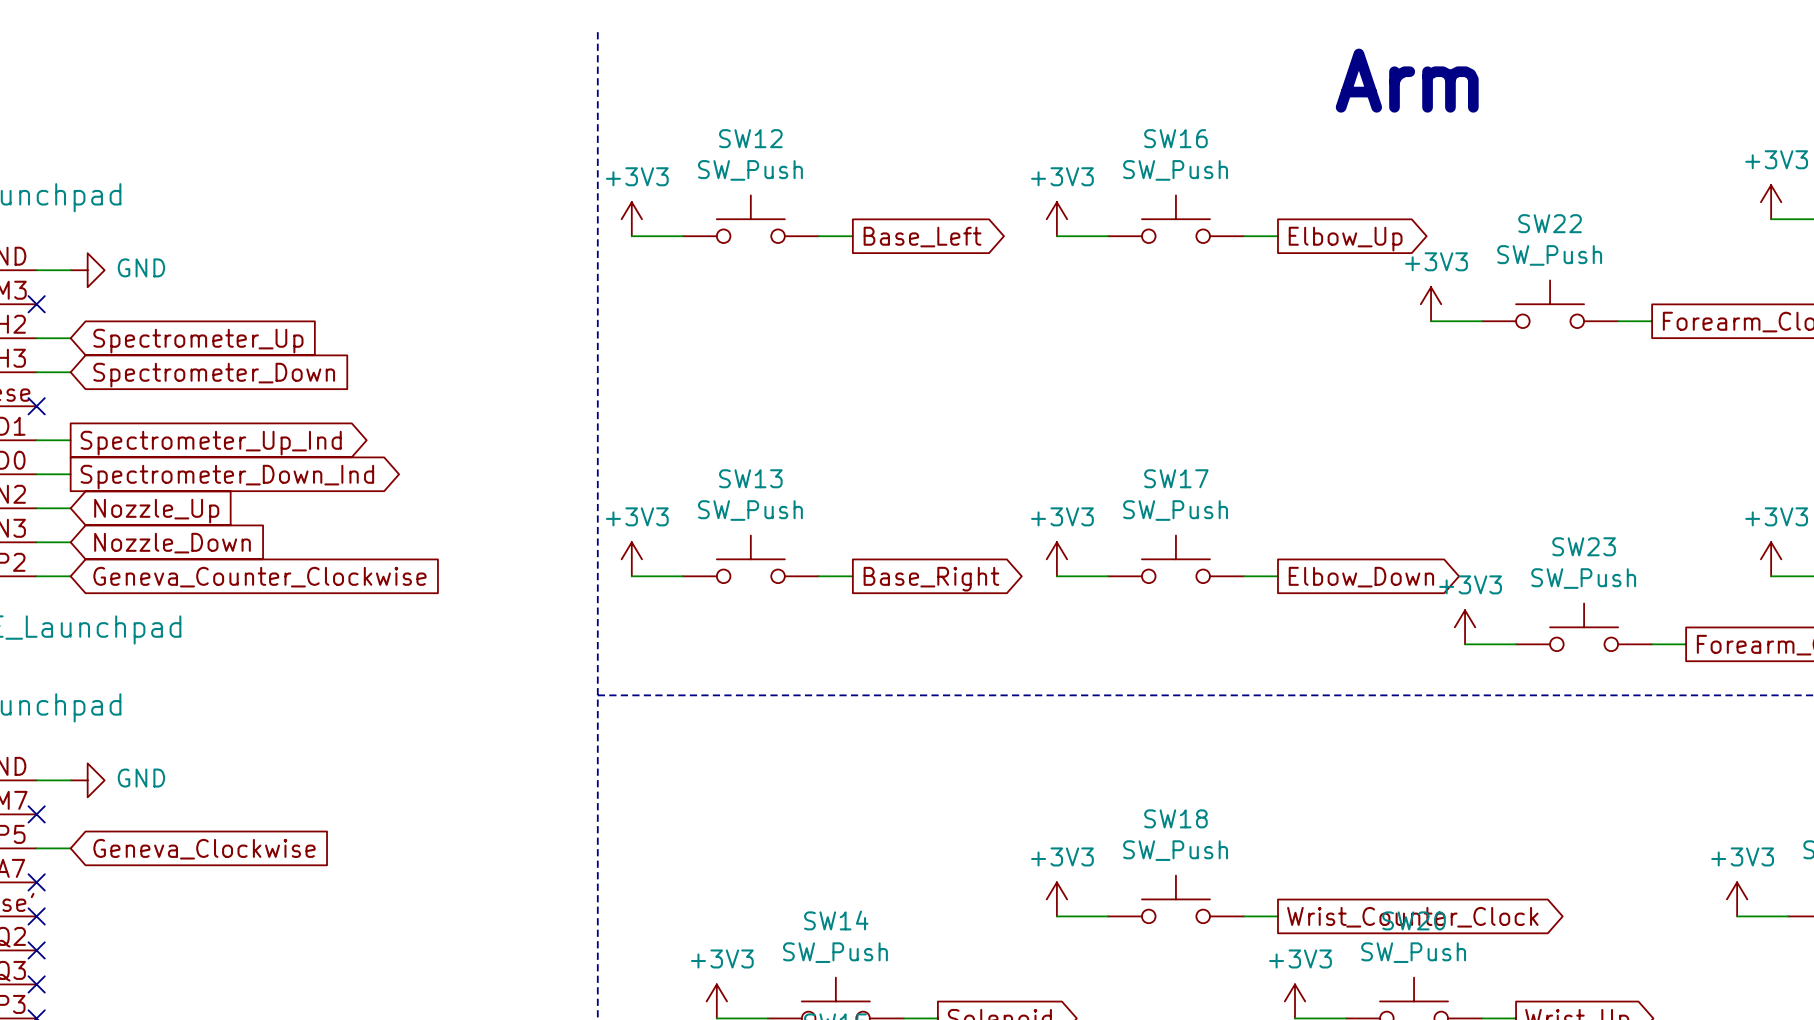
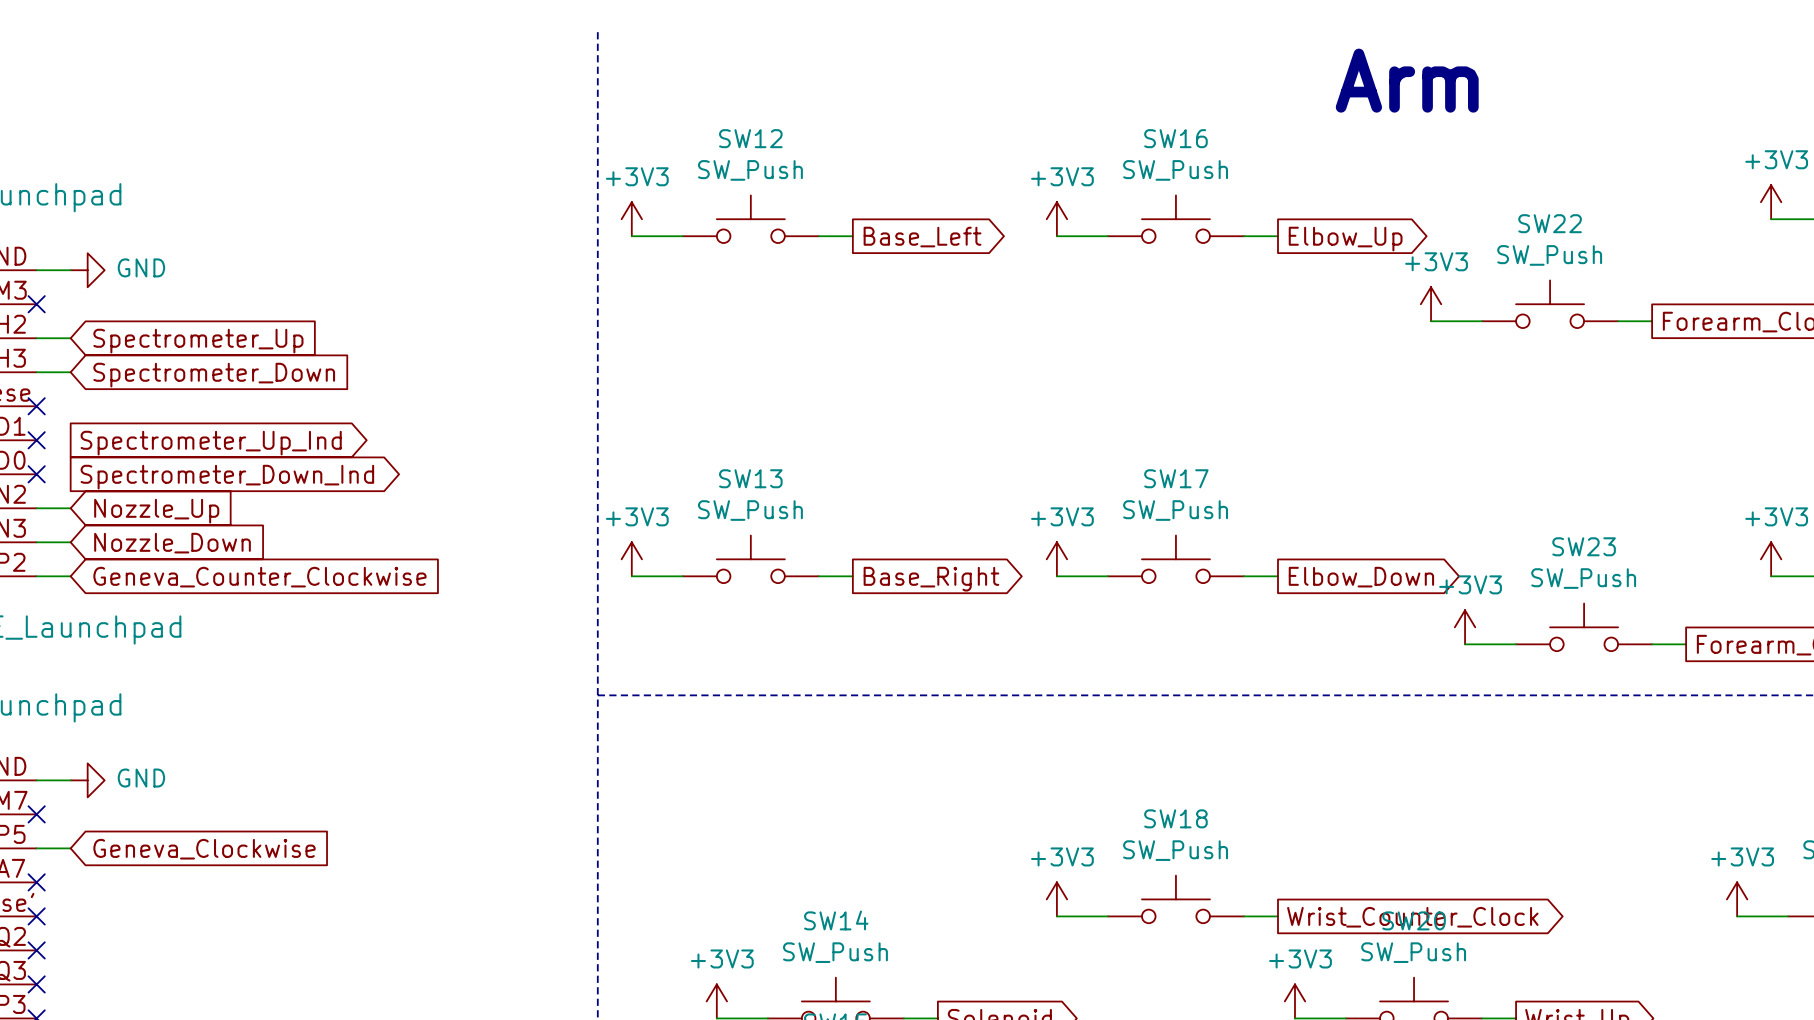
wire: (36, 440) (70, 440) -> none
no-connect mark: none -> (36, 440)
wire: (36, 474) (70, 474) -> none
no-connect mark: none -> (36, 474)

